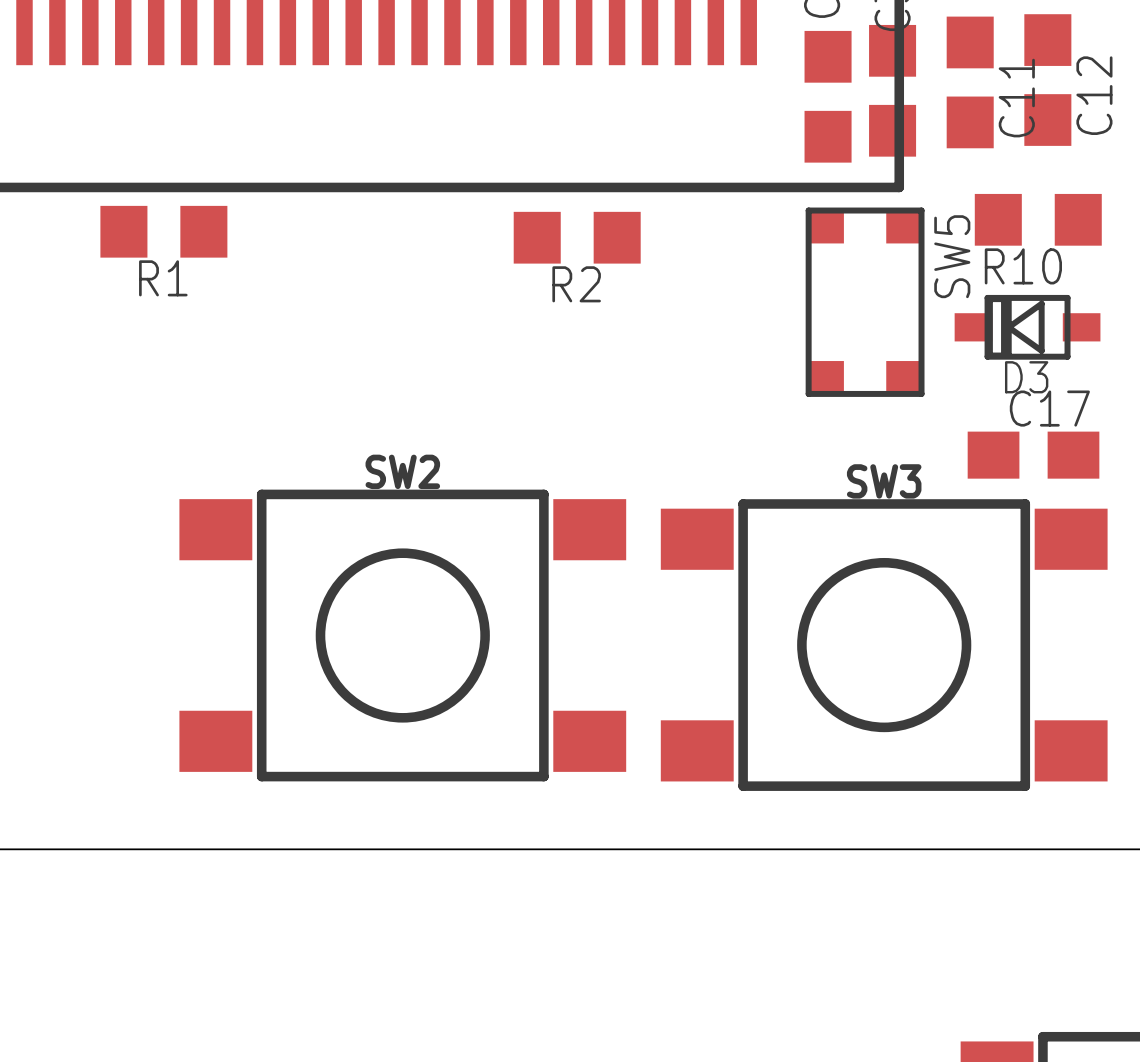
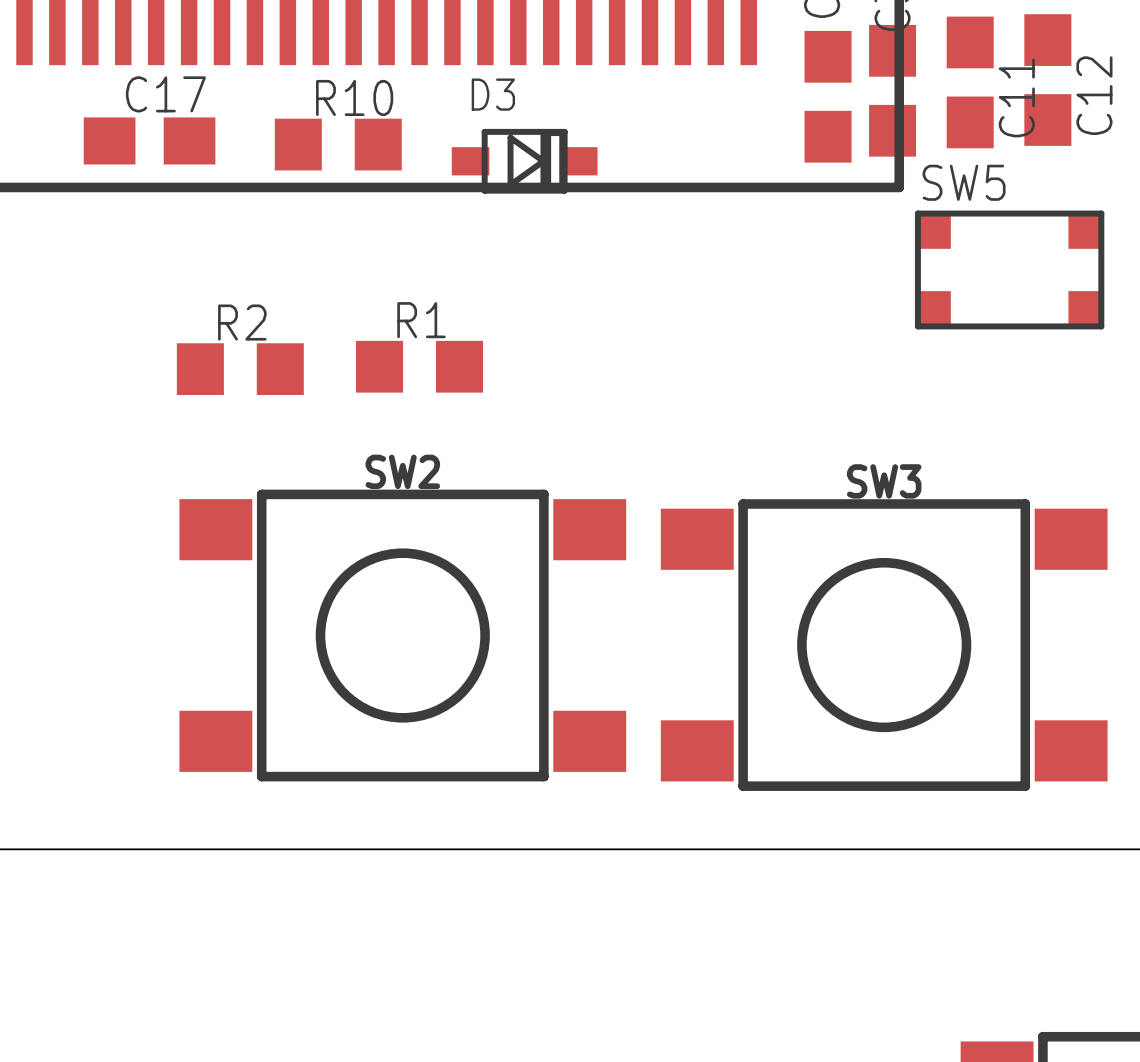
R10 position: (1038, 219) -> (338, 144)
R1 position: (163, 231) -> (419, 366)
R2 position: (577, 237) -> (240, 369)
SW5 name position: SW5 (952, 256) -> SW5 (964, 182)
R10 name position: R10 (1023, 266) -> R10 (354, 97)
R1 name position: R1 (163, 278) -> R1 (421, 320)
R2 name position: R2 (576, 284) -> R2 (242, 322)
SW5 rotation: 0° (865, 302) -> 90° clockwise (1009, 269)
SW5 position: (865, 302) -> (1009, 269)
D3 rotation: 0° (1027, 327) -> 180° (524, 161)
D3 position: (1027, 327) -> (524, 161)
C17 position: (1033, 455) -> (149, 140)

